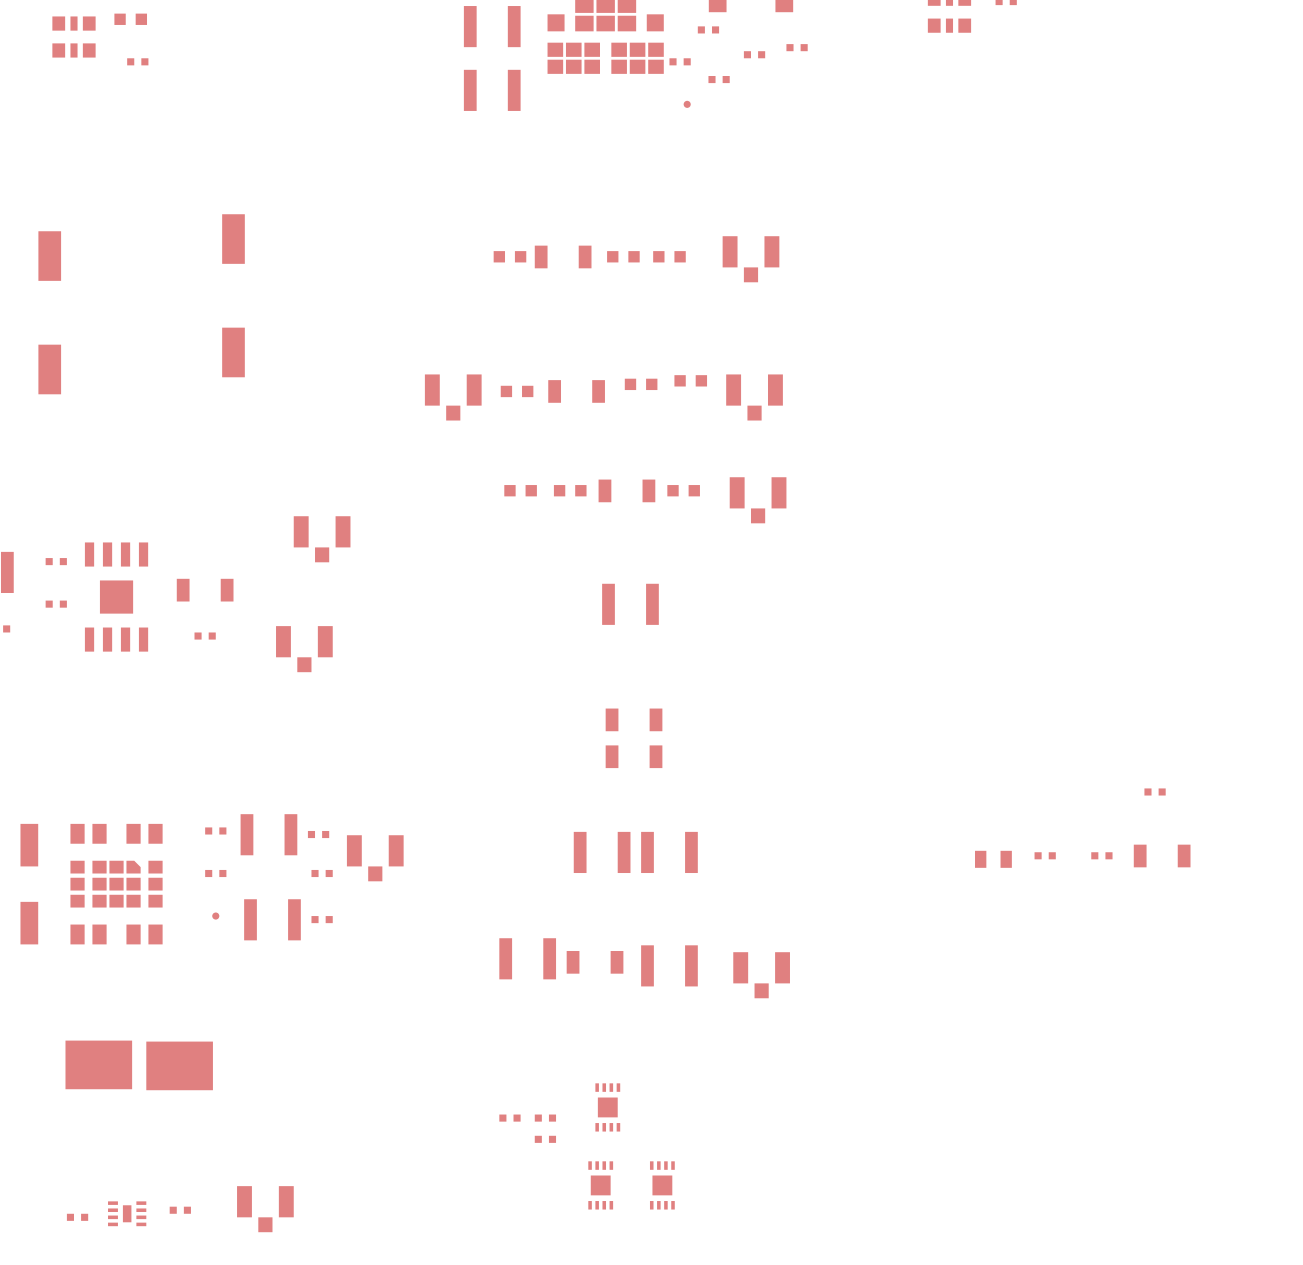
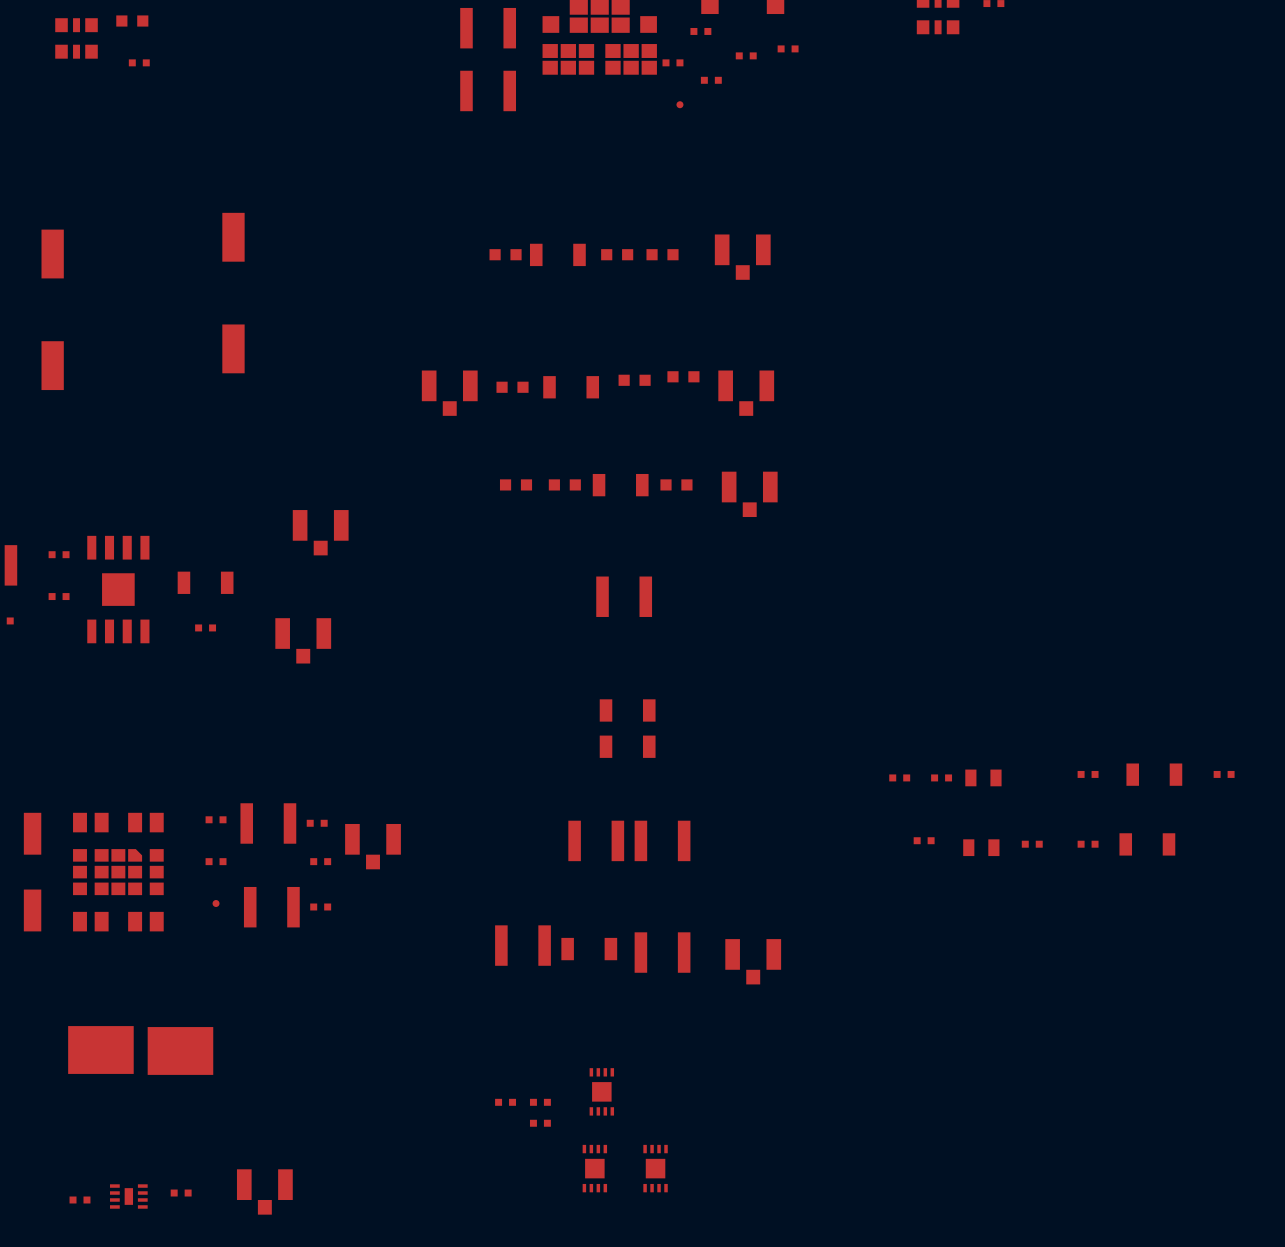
part: none -> (1088, 774)
part: none -> (1224, 774)
part: none -> (1154, 774)
part: none -> (899, 777)
part: none -> (941, 777)
part: none -> (983, 777)
part: (1155, 791) -> none
part: none -> (924, 840)

